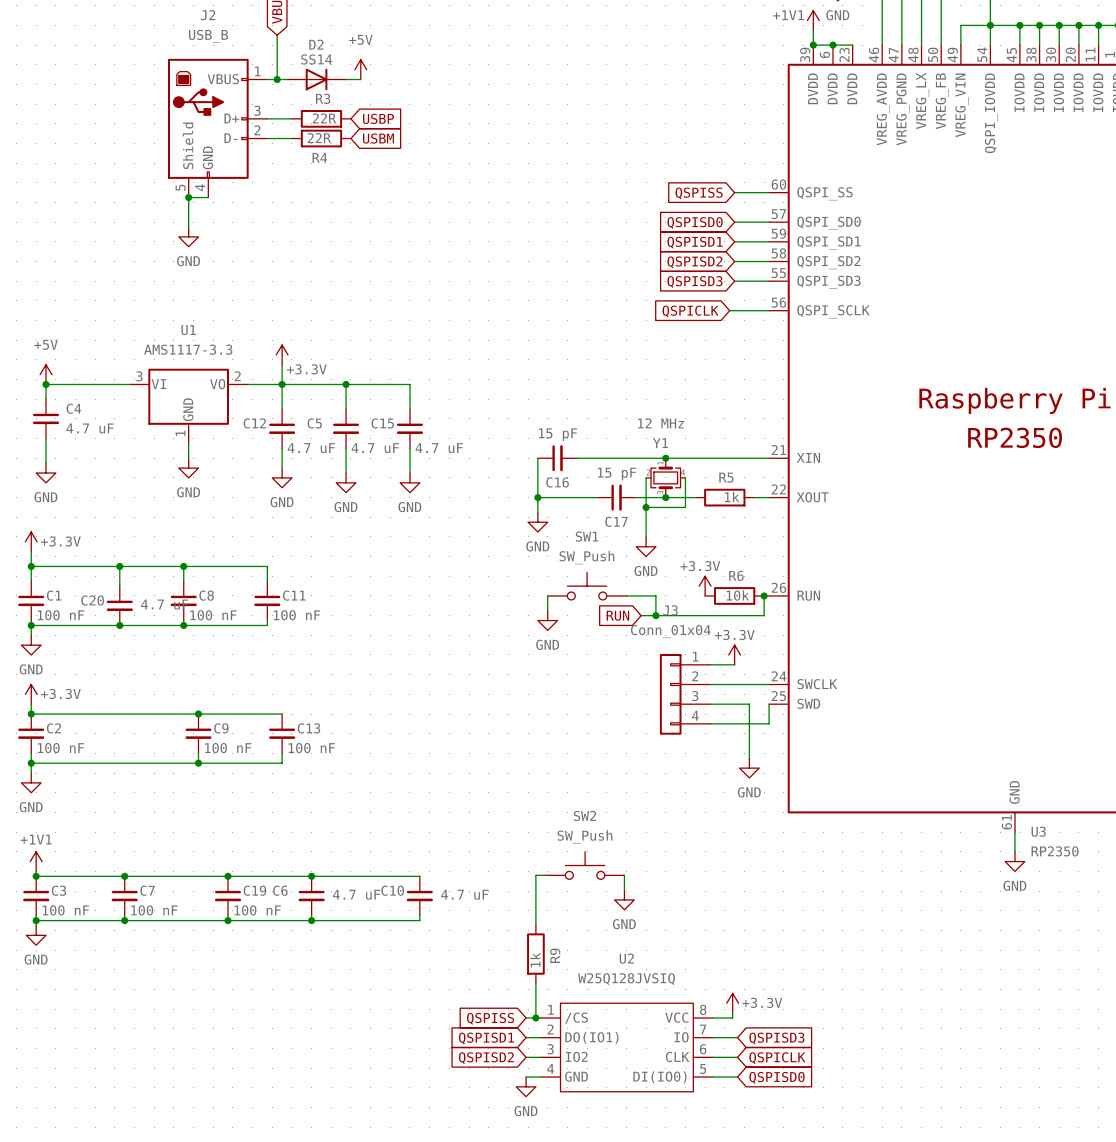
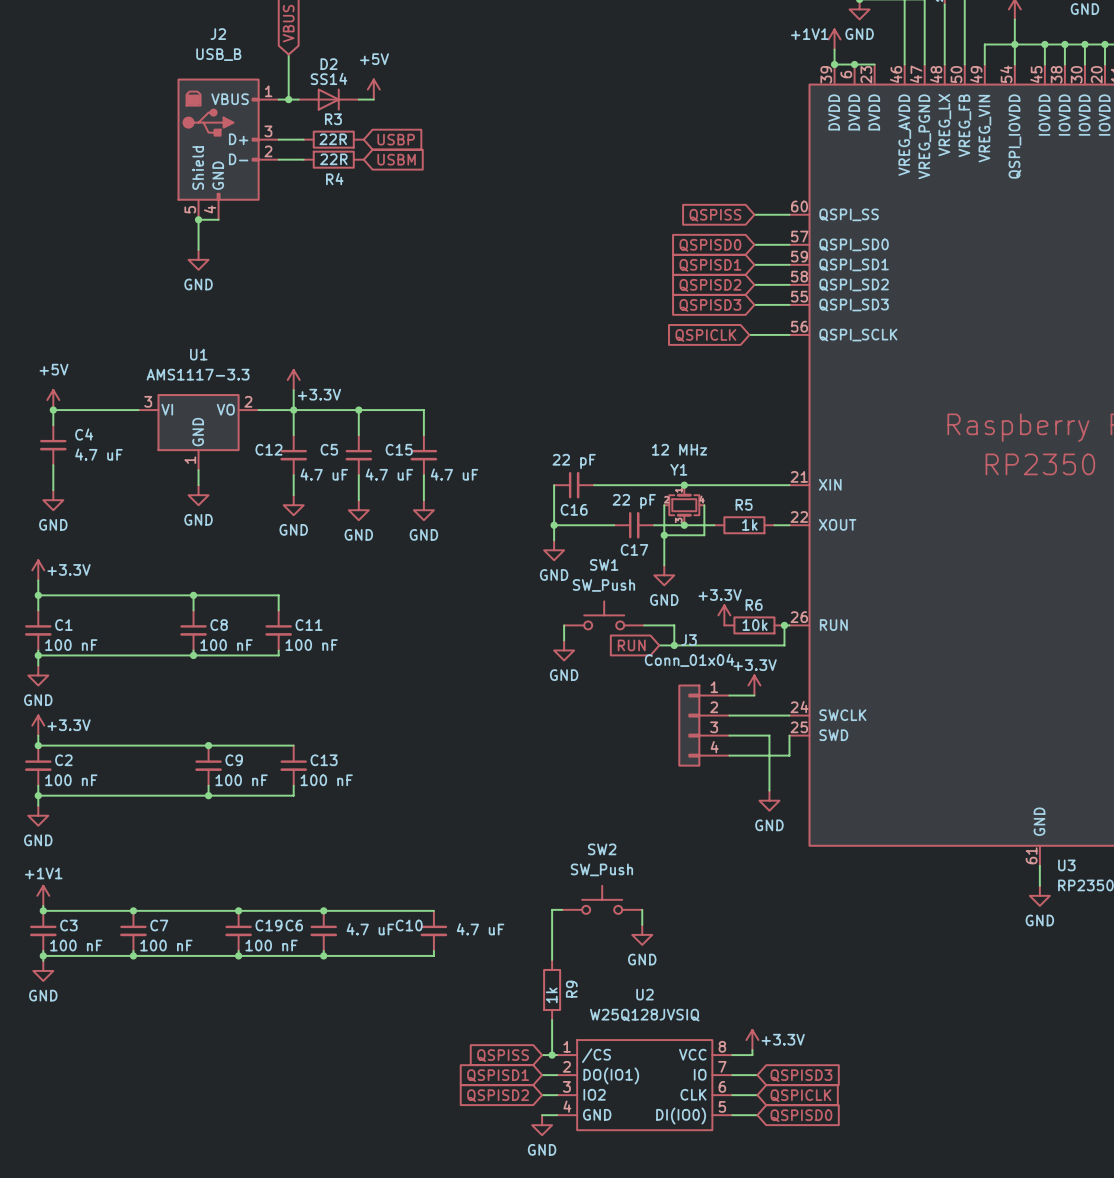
C16 value: 15 pF (557, 434) -> 22 pF (574, 461)
C17 value: 15 pF (616, 474) -> 22 pF (634, 501)
wire: (119, 566) (119, 586) -> none
junction: (119, 566) -> none
C20: 4.7 uF (119, 605) -> none
junction: (119, 625) -> none

